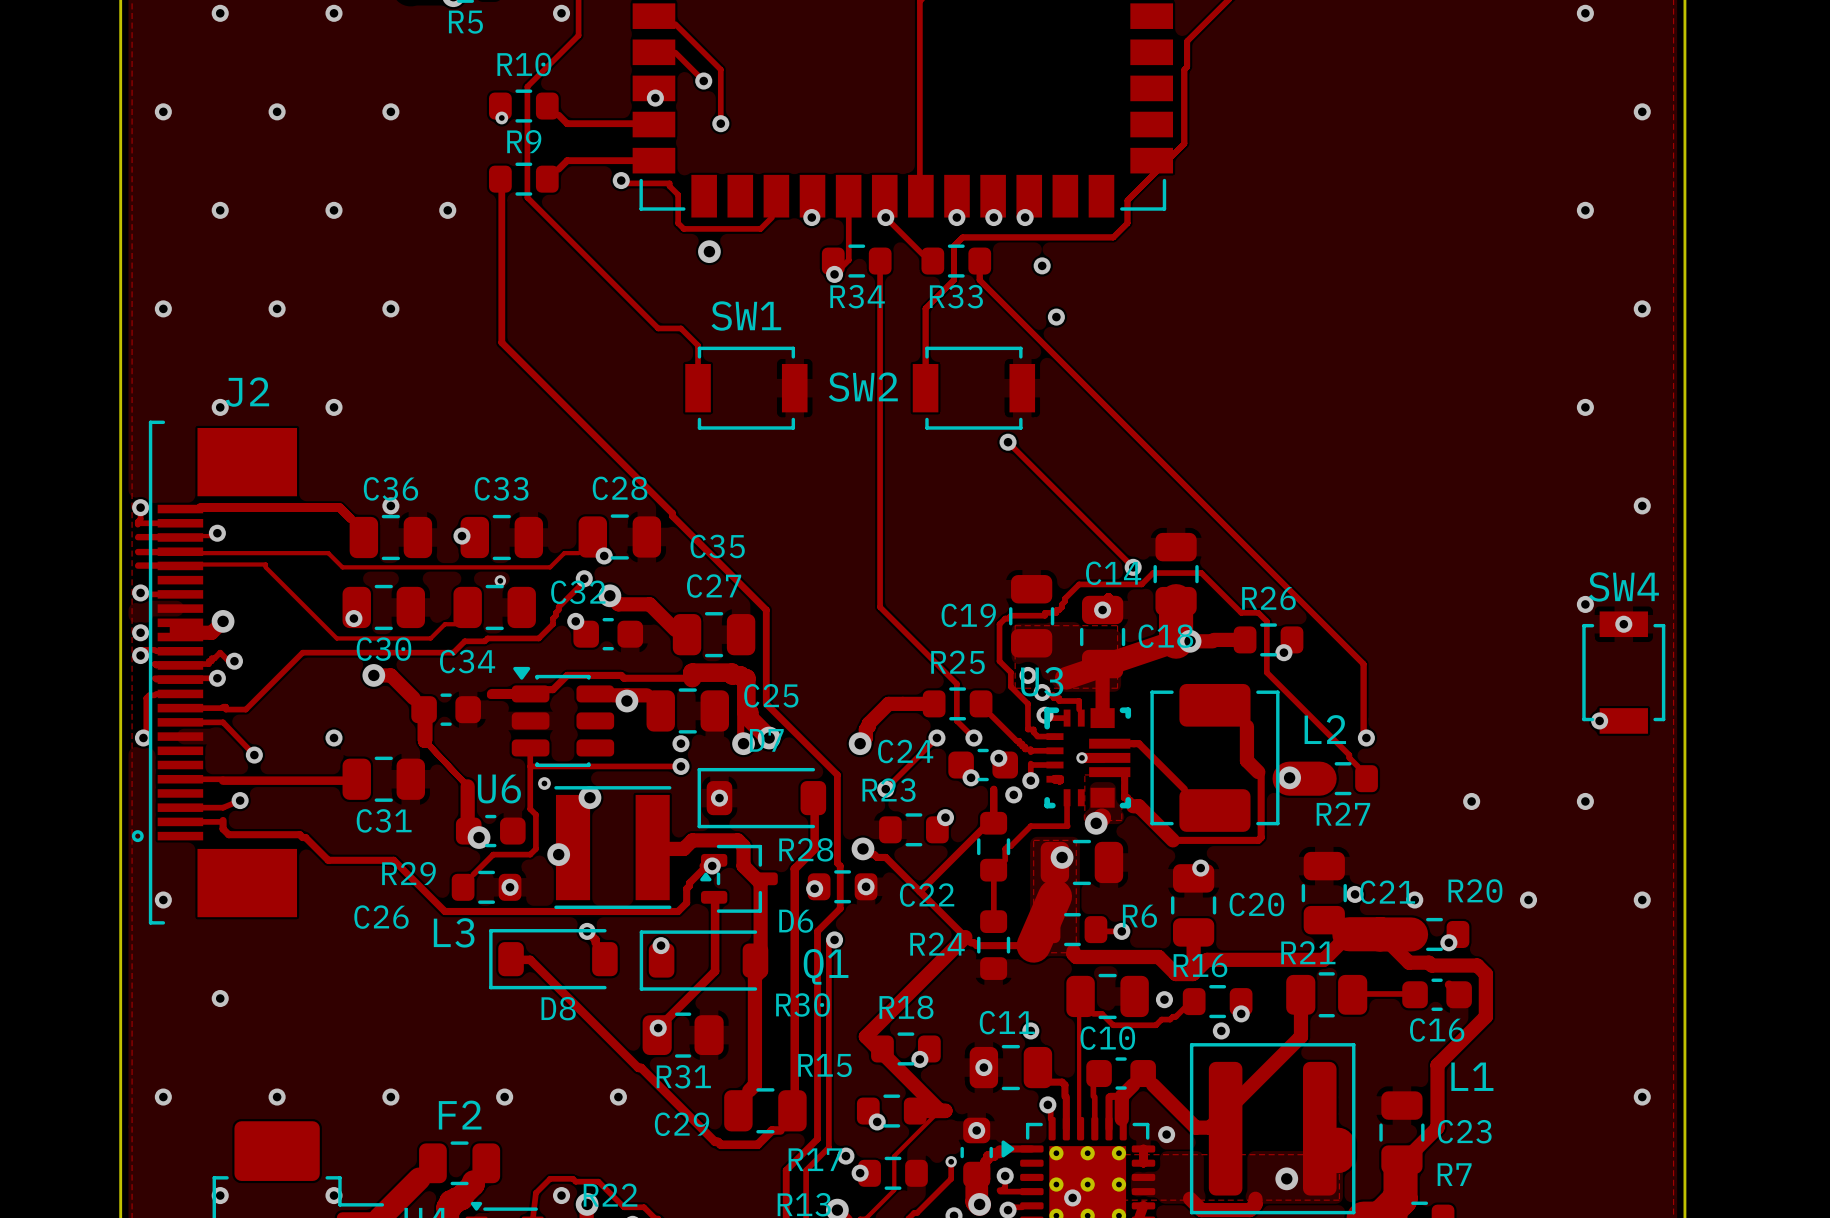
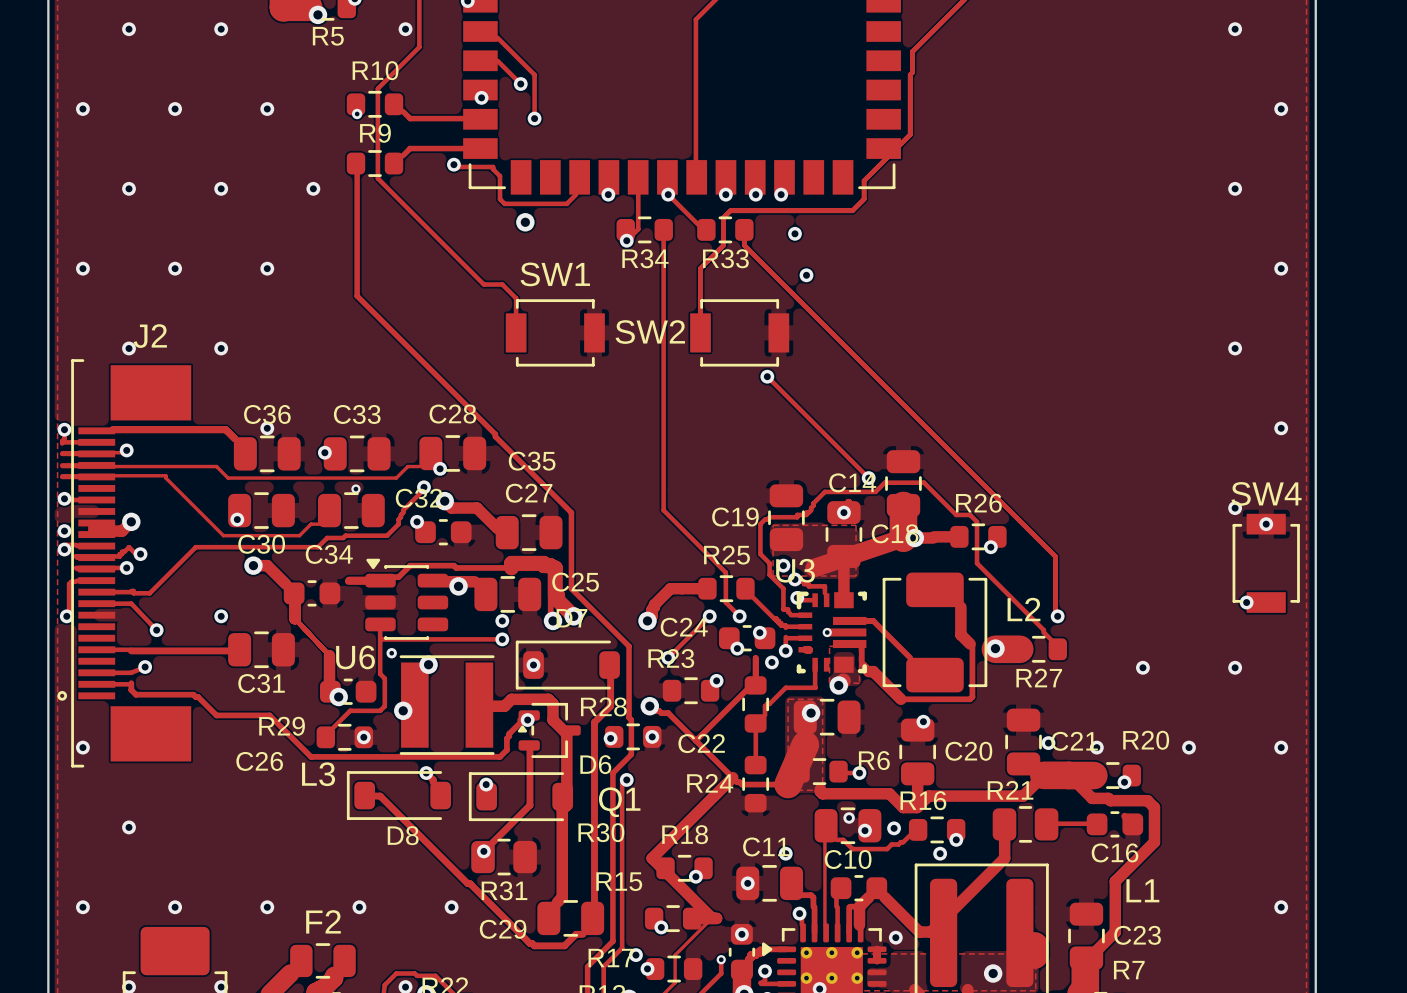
via: none -> (849, 817)
via: none -> (864, 830)

